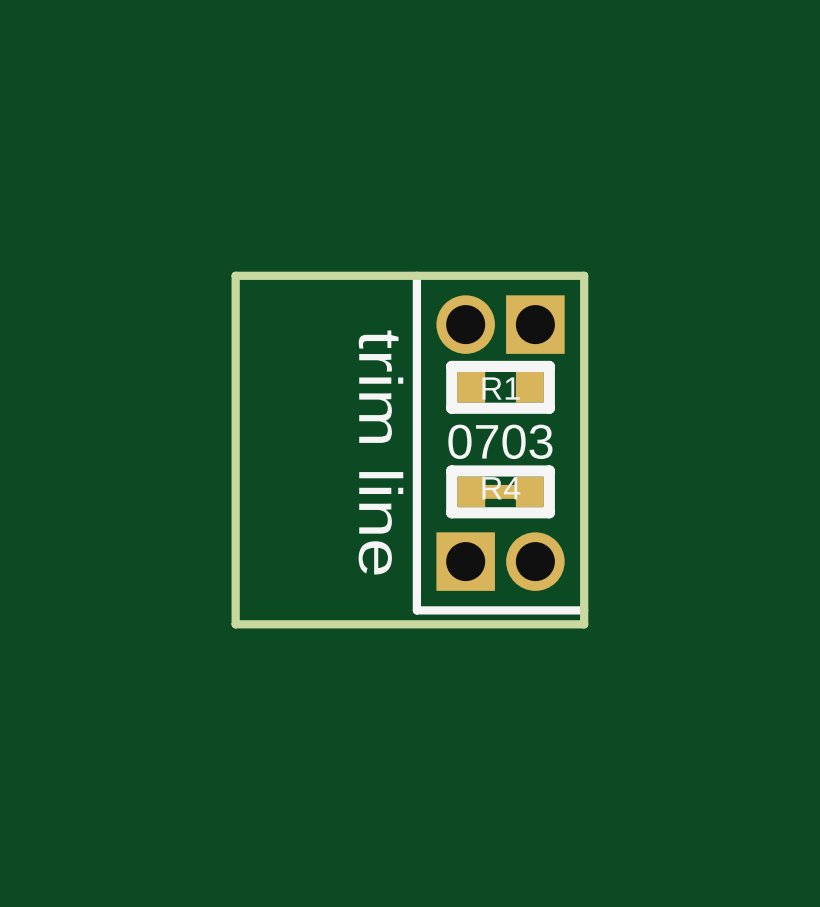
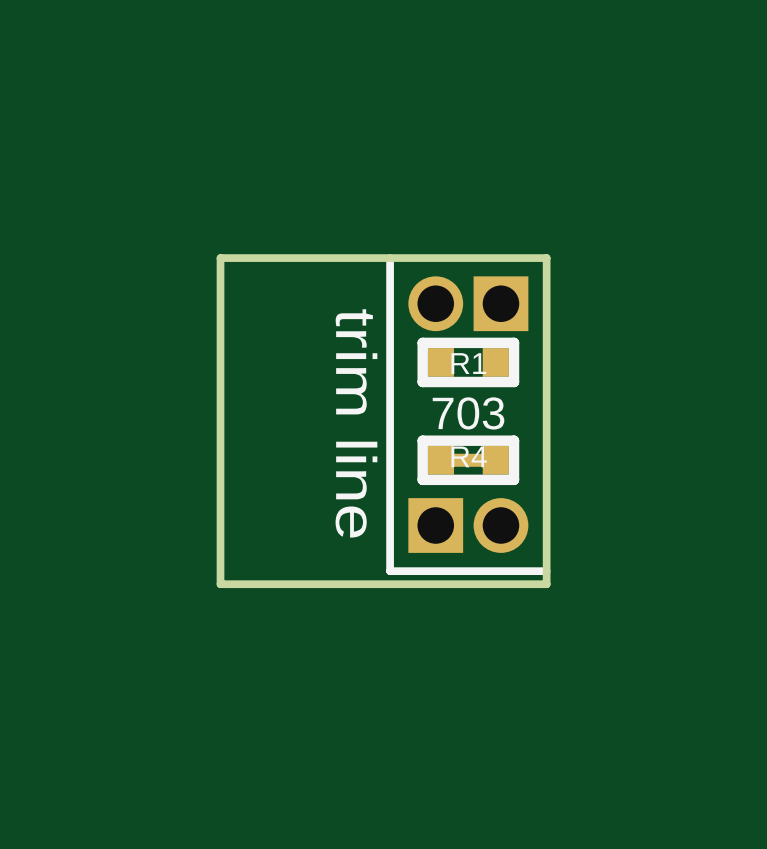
text: 0703 (500, 441) -> 703 (468, 413)

